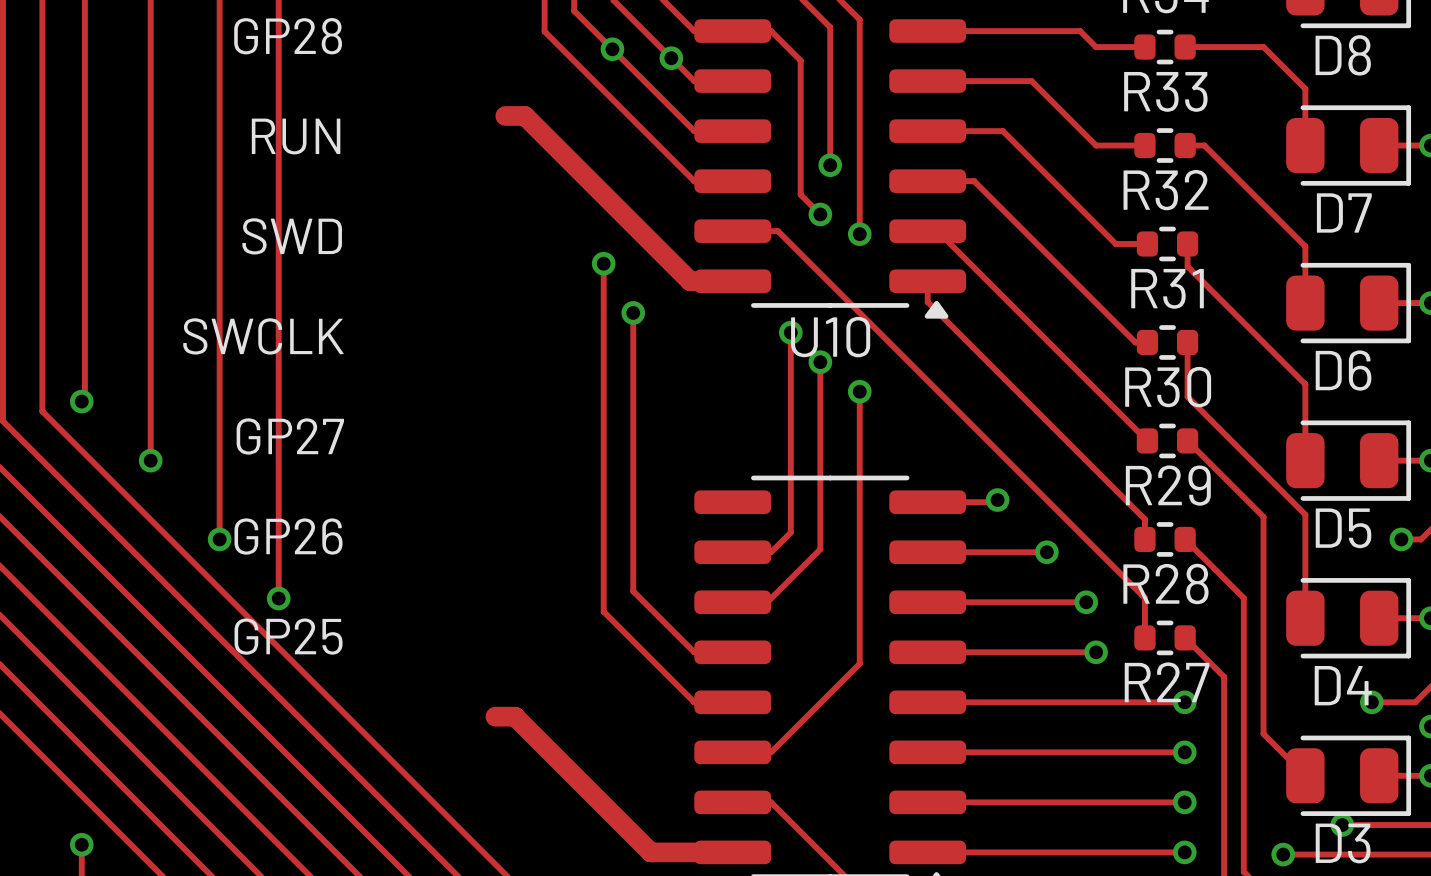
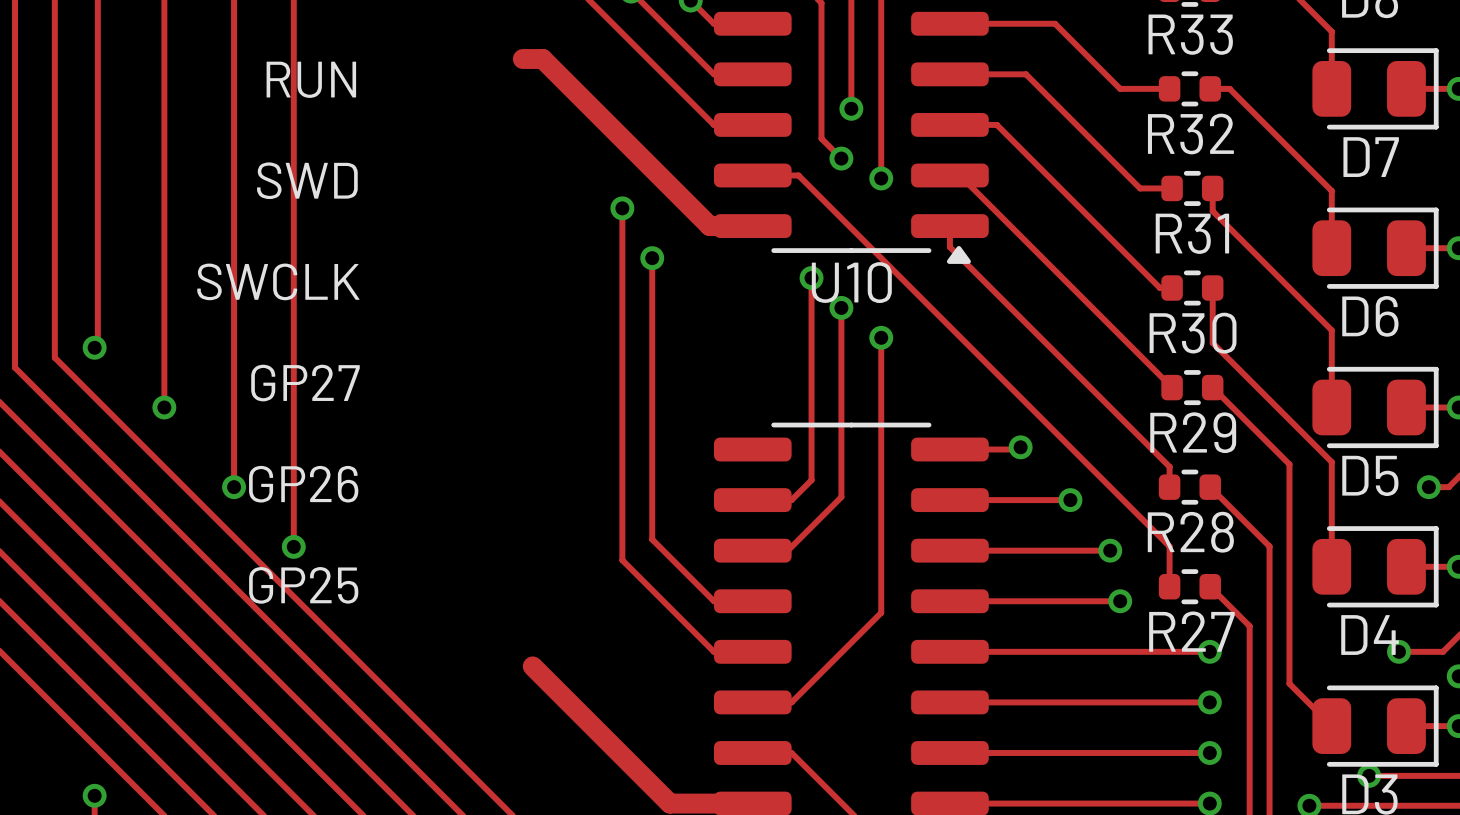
track: (495, 716) (515, 716) -> none

